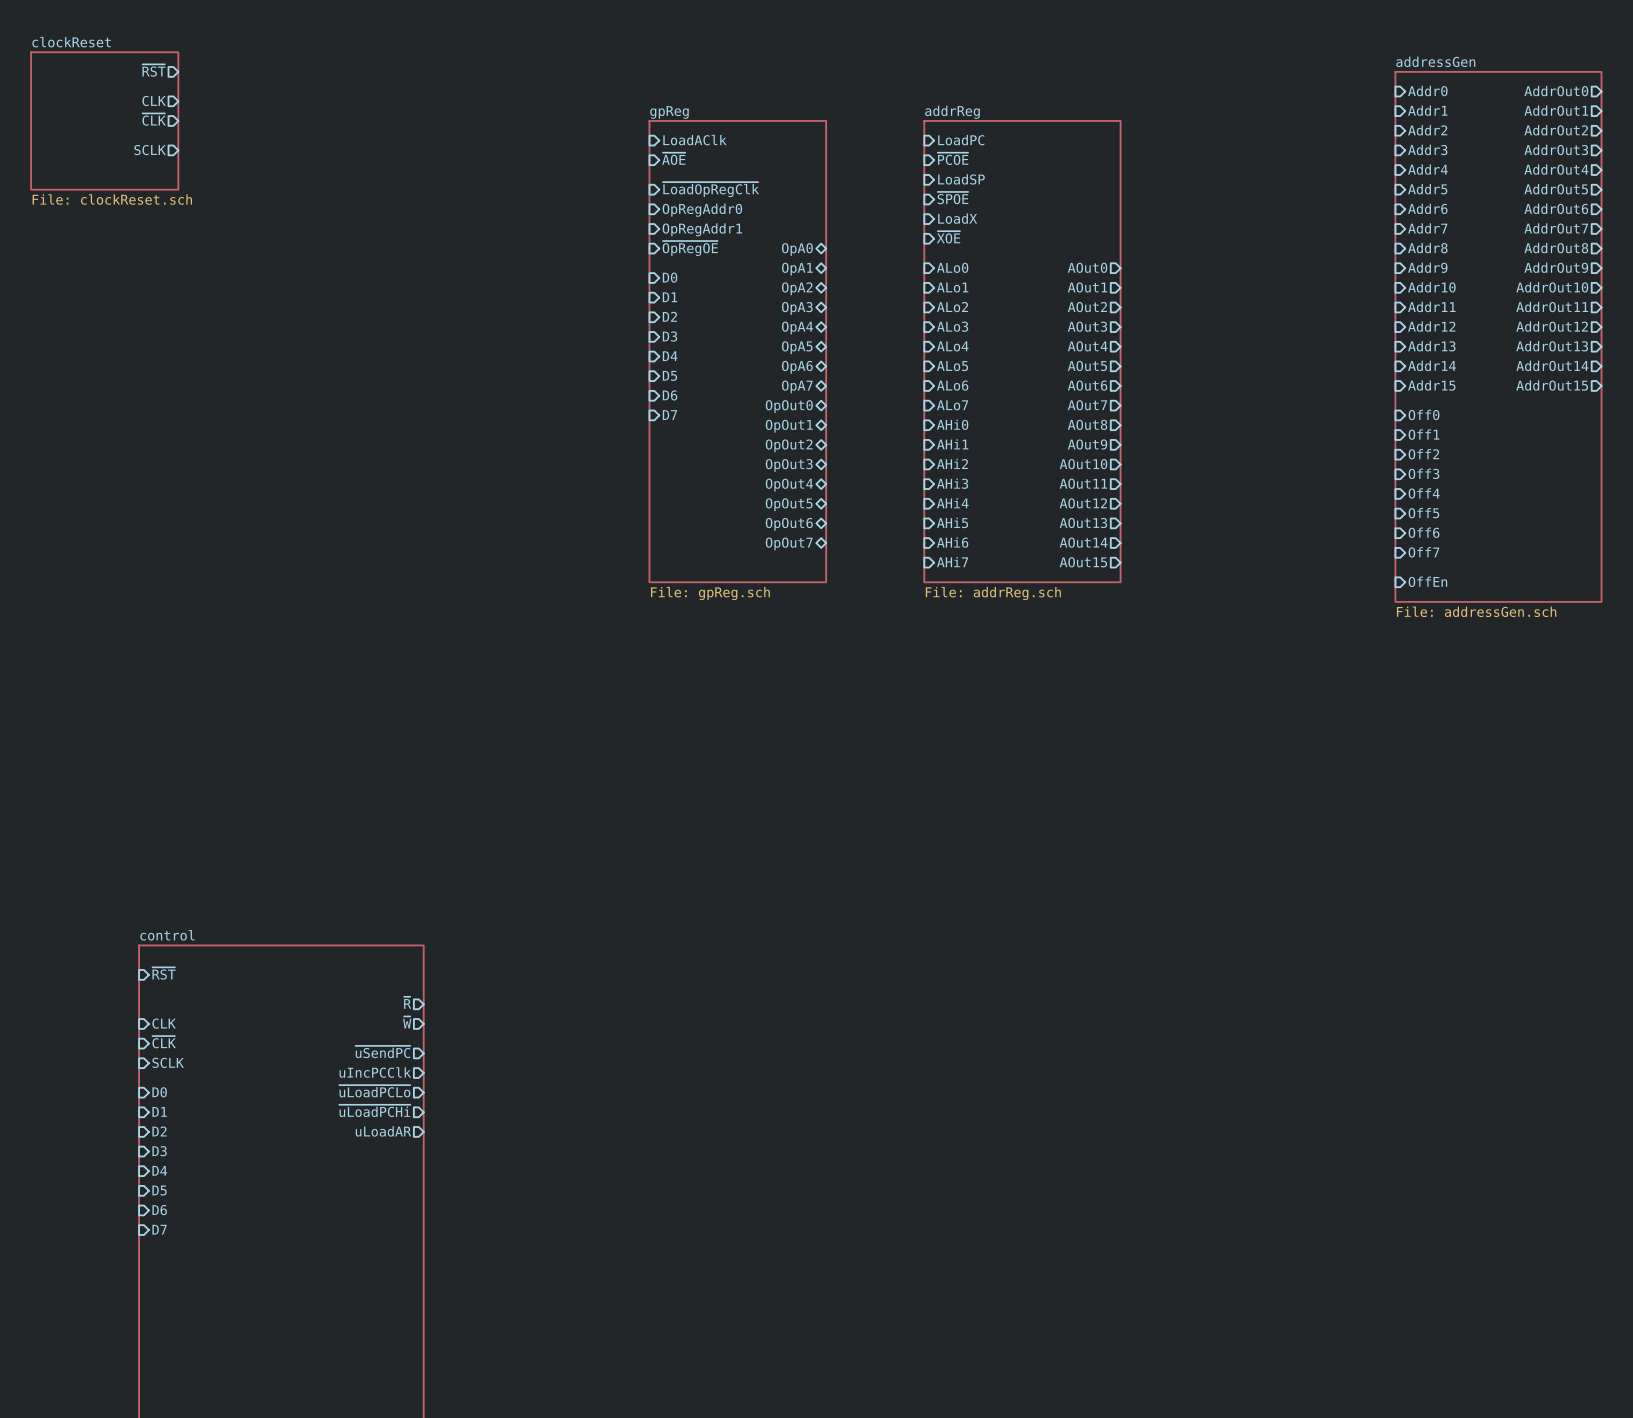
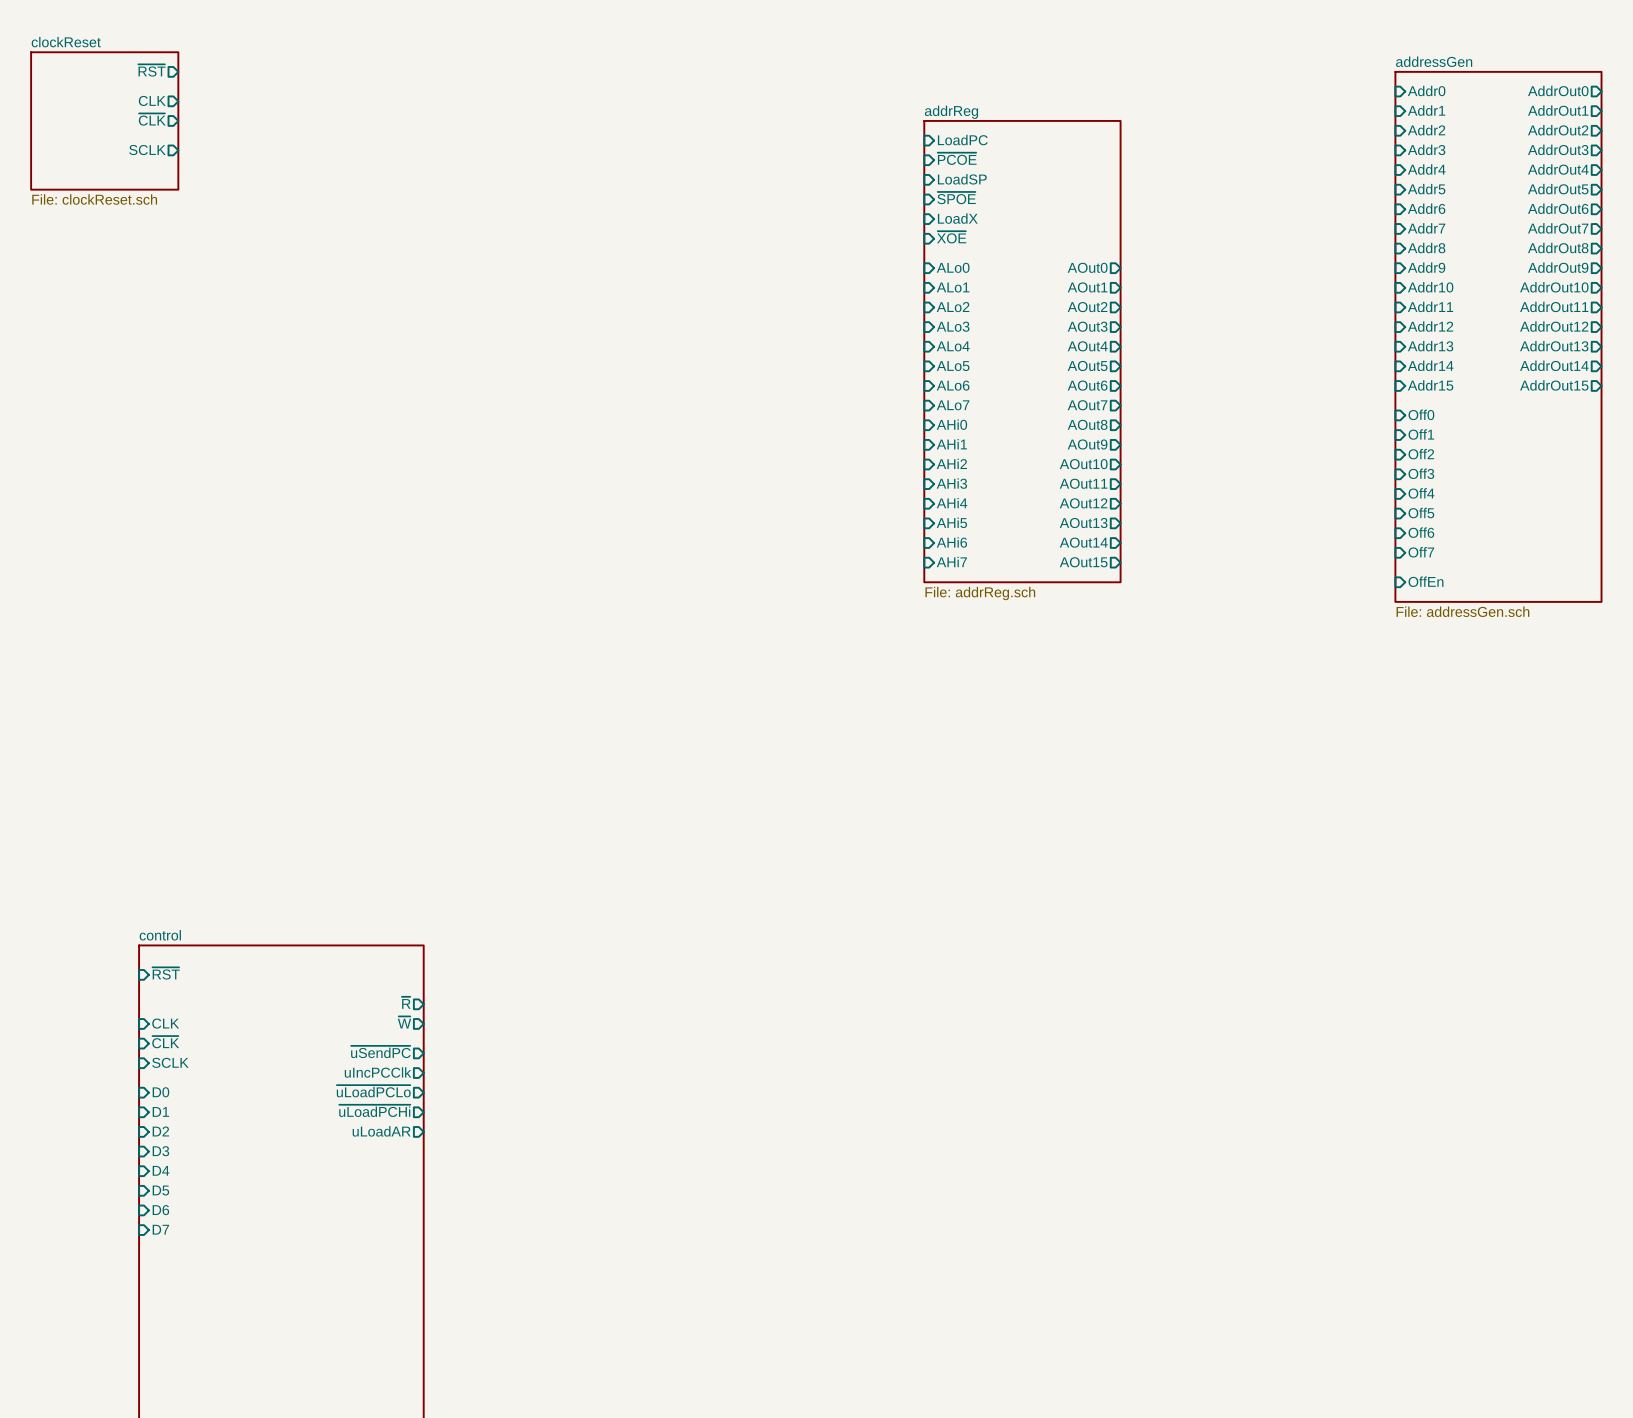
sheet pin: LoadAClk (694, 140) -> none
sheet pin: ~{AOE} (673, 158) -> none
sheet pin: ~{LoadOpRegClk} (710, 189) -> none
sheet pin: OpRegAddr0 (702, 210) -> none
sheet pin: OpRegAddr1 (702, 229) -> none
sheet pin: ~{OpRegOE} (690, 248) -> none
sheet pin: OpA0 (797, 249) -> none
sheet pin: OpA1 (797, 269) -> none
sheet pin: D0 (670, 277) -> none
sheet pin: OpA2 (797, 288) -> none
sheet pin: D1 (670, 297) -> none
sheet pin: OpA3 (797, 308) -> none
sheet pin: D2 (669, 316) -> none
sheet pin: OpA4 (797, 328) -> none
sheet pin: D3 (669, 336) -> none
sheet pin: OpA5 (797, 347) -> none
sheet gpReg: File: gpReg.sch (737, 351) -> none
sheet pin: D4 (670, 356) -> none
sheet pin: OpA6 (797, 367) -> none
sheet pin: D5 (669, 375) -> none
sheet pin: OpA7 (797, 386) -> none
sheet pin: D6 (670, 395) -> none
sheet pin: OpOut0 (789, 406) -> none
sheet pin: D7 (669, 415) -> none
sheet pin: OpOut1 (789, 426) -> none
sheet pin: OpOut2 (789, 445) -> none
sheet pin: OpOut3 (789, 465) -> none
sheet pin: OpOut4 (789, 485) -> none
sheet pin: OpOut5 (789, 504) -> none
sheet pin: OpOut6 (789, 524) -> none
sheet pin: OpOut7 (789, 543) -> none

